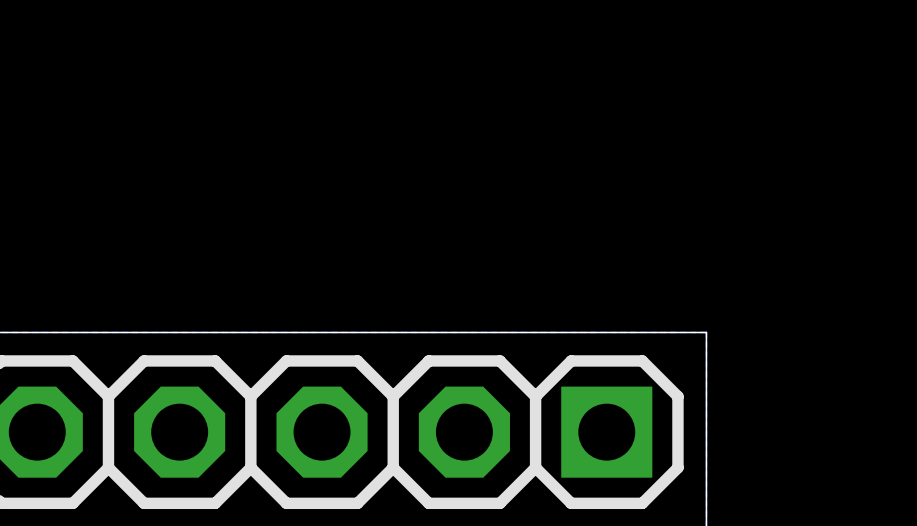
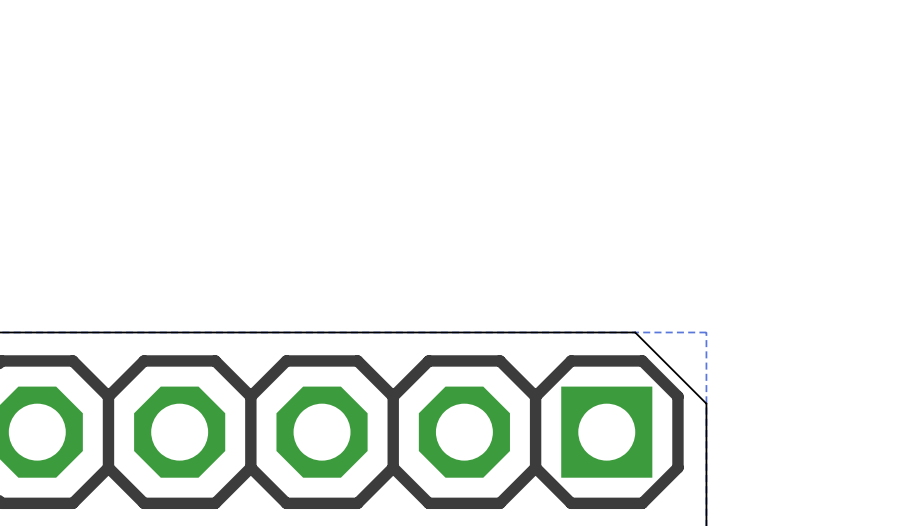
board edge: (635, 332) (706, 332) (706, 403) -> (635, 332) (706, 403)

